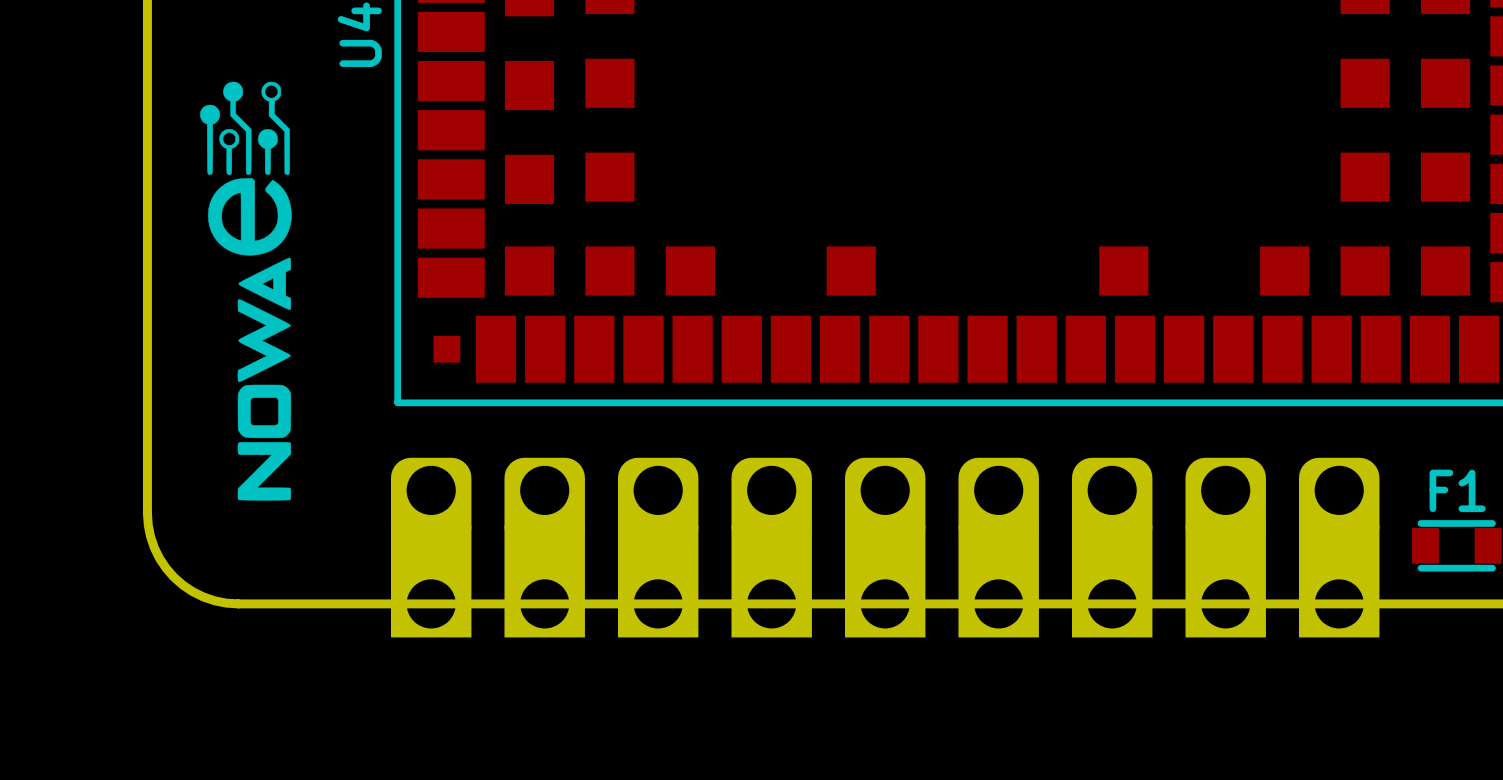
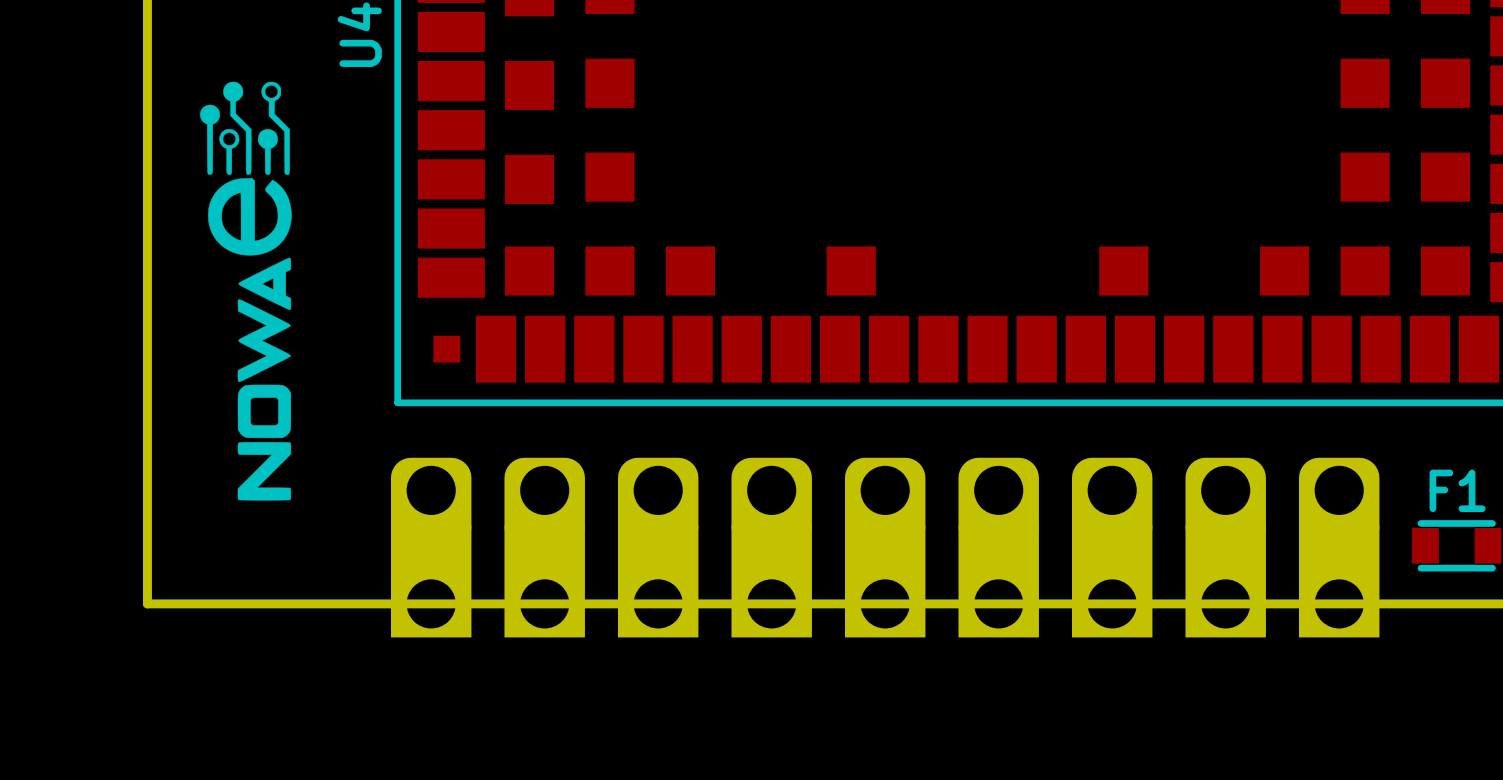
board edge: (147, 513) (150, 536) (154, 547) (159, 558) (174, 577) (192, 591) (203, 596) (214, 600) (238, 603) -> (147, 513) (147, 603) (238, 603)

